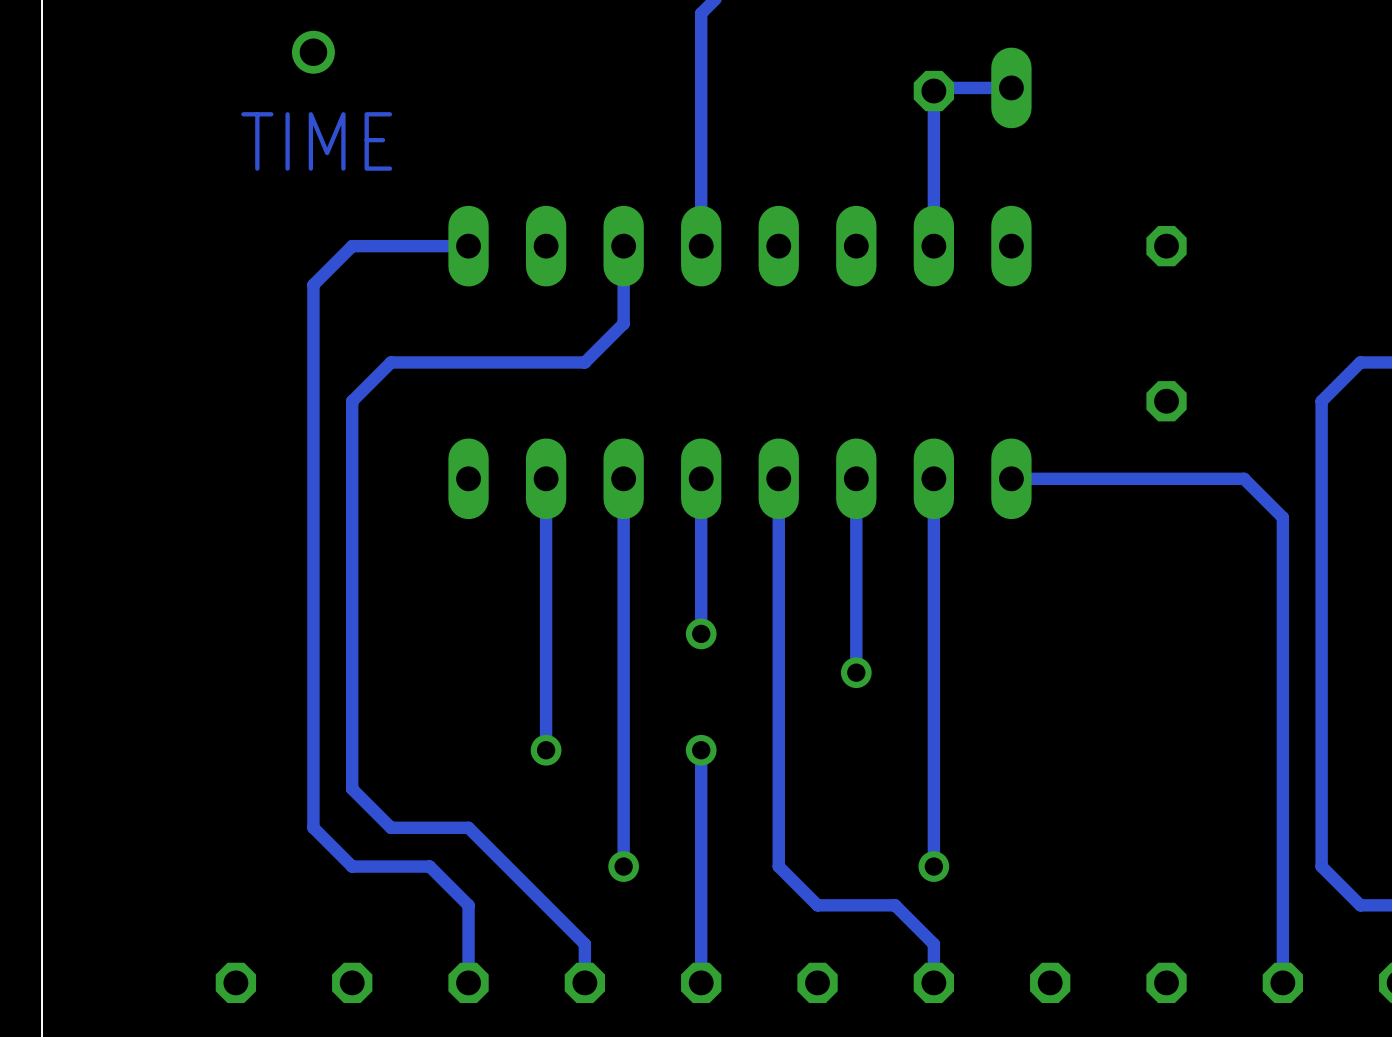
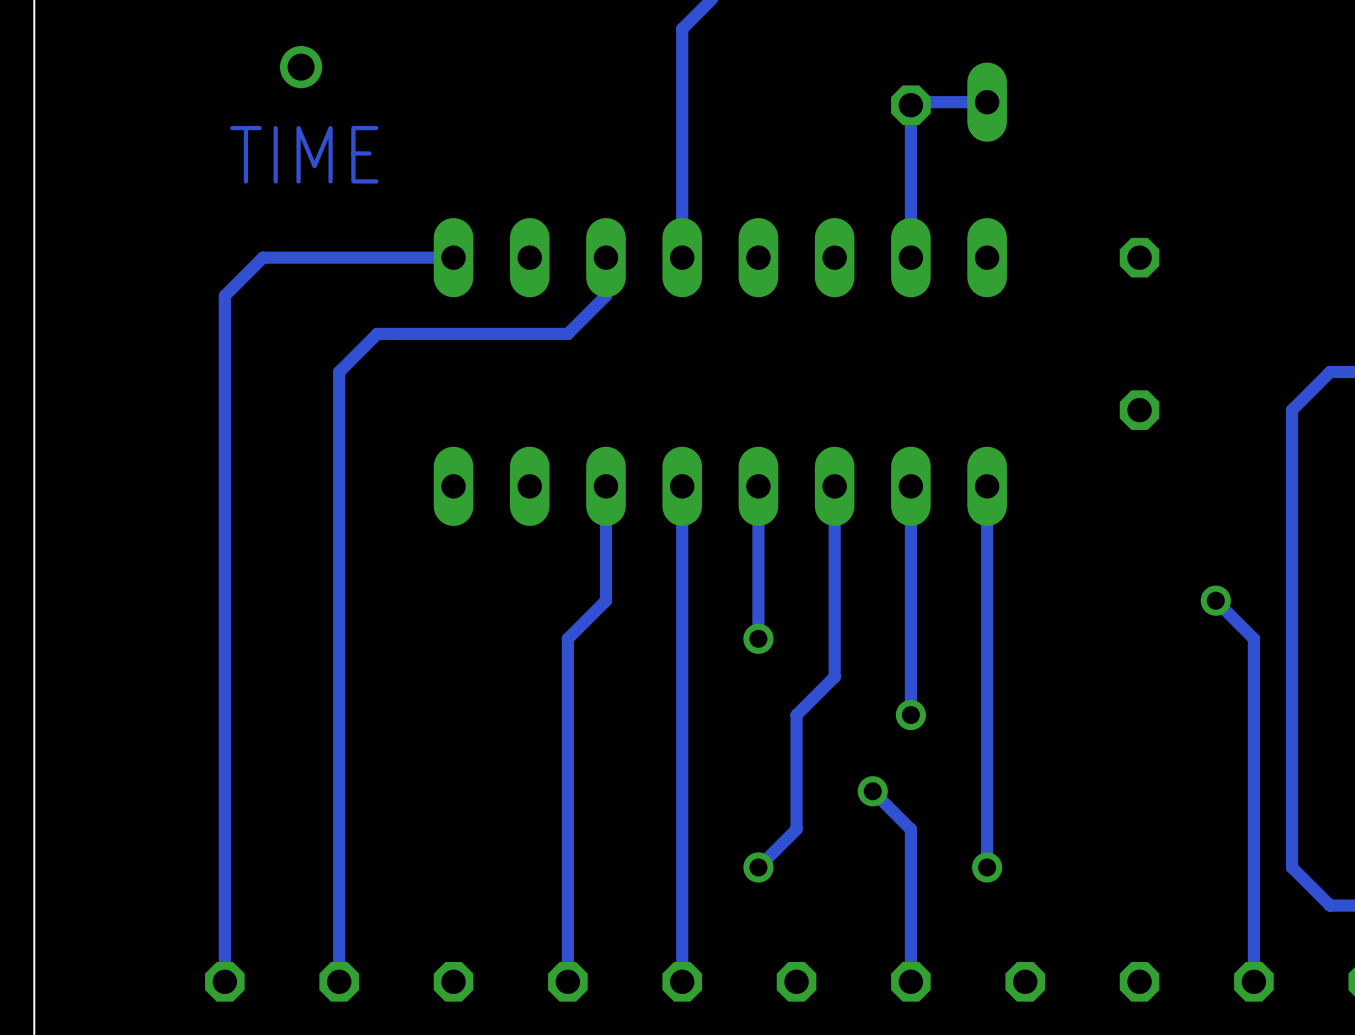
track: (352, 246) (313, 284) (313, 827) (352, 866) (429, 866) (468, 905) (468, 982) -> (339, 257) (262, 257) (224, 295) (224, 981)
track: (623, 284) (623, 323) (584, 362) (390, 362) (352, 401) -> (605, 295) (567, 333) (377, 333) (339, 372) (339, 410)
track: (546, 478) (546, 750) -> none
track: (1011, 478) (1244, 478) (1282, 517) (1282, 633) -> (1215, 600) (1253, 638)
track: none -> (987, 486) (987, 867)
track: (623, 595) (623, 866) -> (605, 600) (567, 638) (567, 943)
via: none -> (1215, 600)
track: none -> (682, 638) (682, 753)
via: (701, 633) -> none
track: (778, 633) (778, 866) (817, 905) (895, 905) (933, 944) -> (910, 867) (910, 943)
via: none -> (758, 638)
track: none -> (834, 676) (796, 715) (796, 829) (758, 867)
via: (856, 672) -> none
track: (933, 711) (933, 827) -> (872, 791) (910, 829)
via: none -> (910, 715)
via: (546, 750) -> none
via: (701, 750) -> none
track: (352, 789) (390, 827) (468, 827) (584, 944) -> (339, 791) (339, 981)
via: none -> (872, 791)
via: (623, 866) -> none
via: none -> (758, 867)
via: (933, 866) -> none
via: none -> (987, 867)

